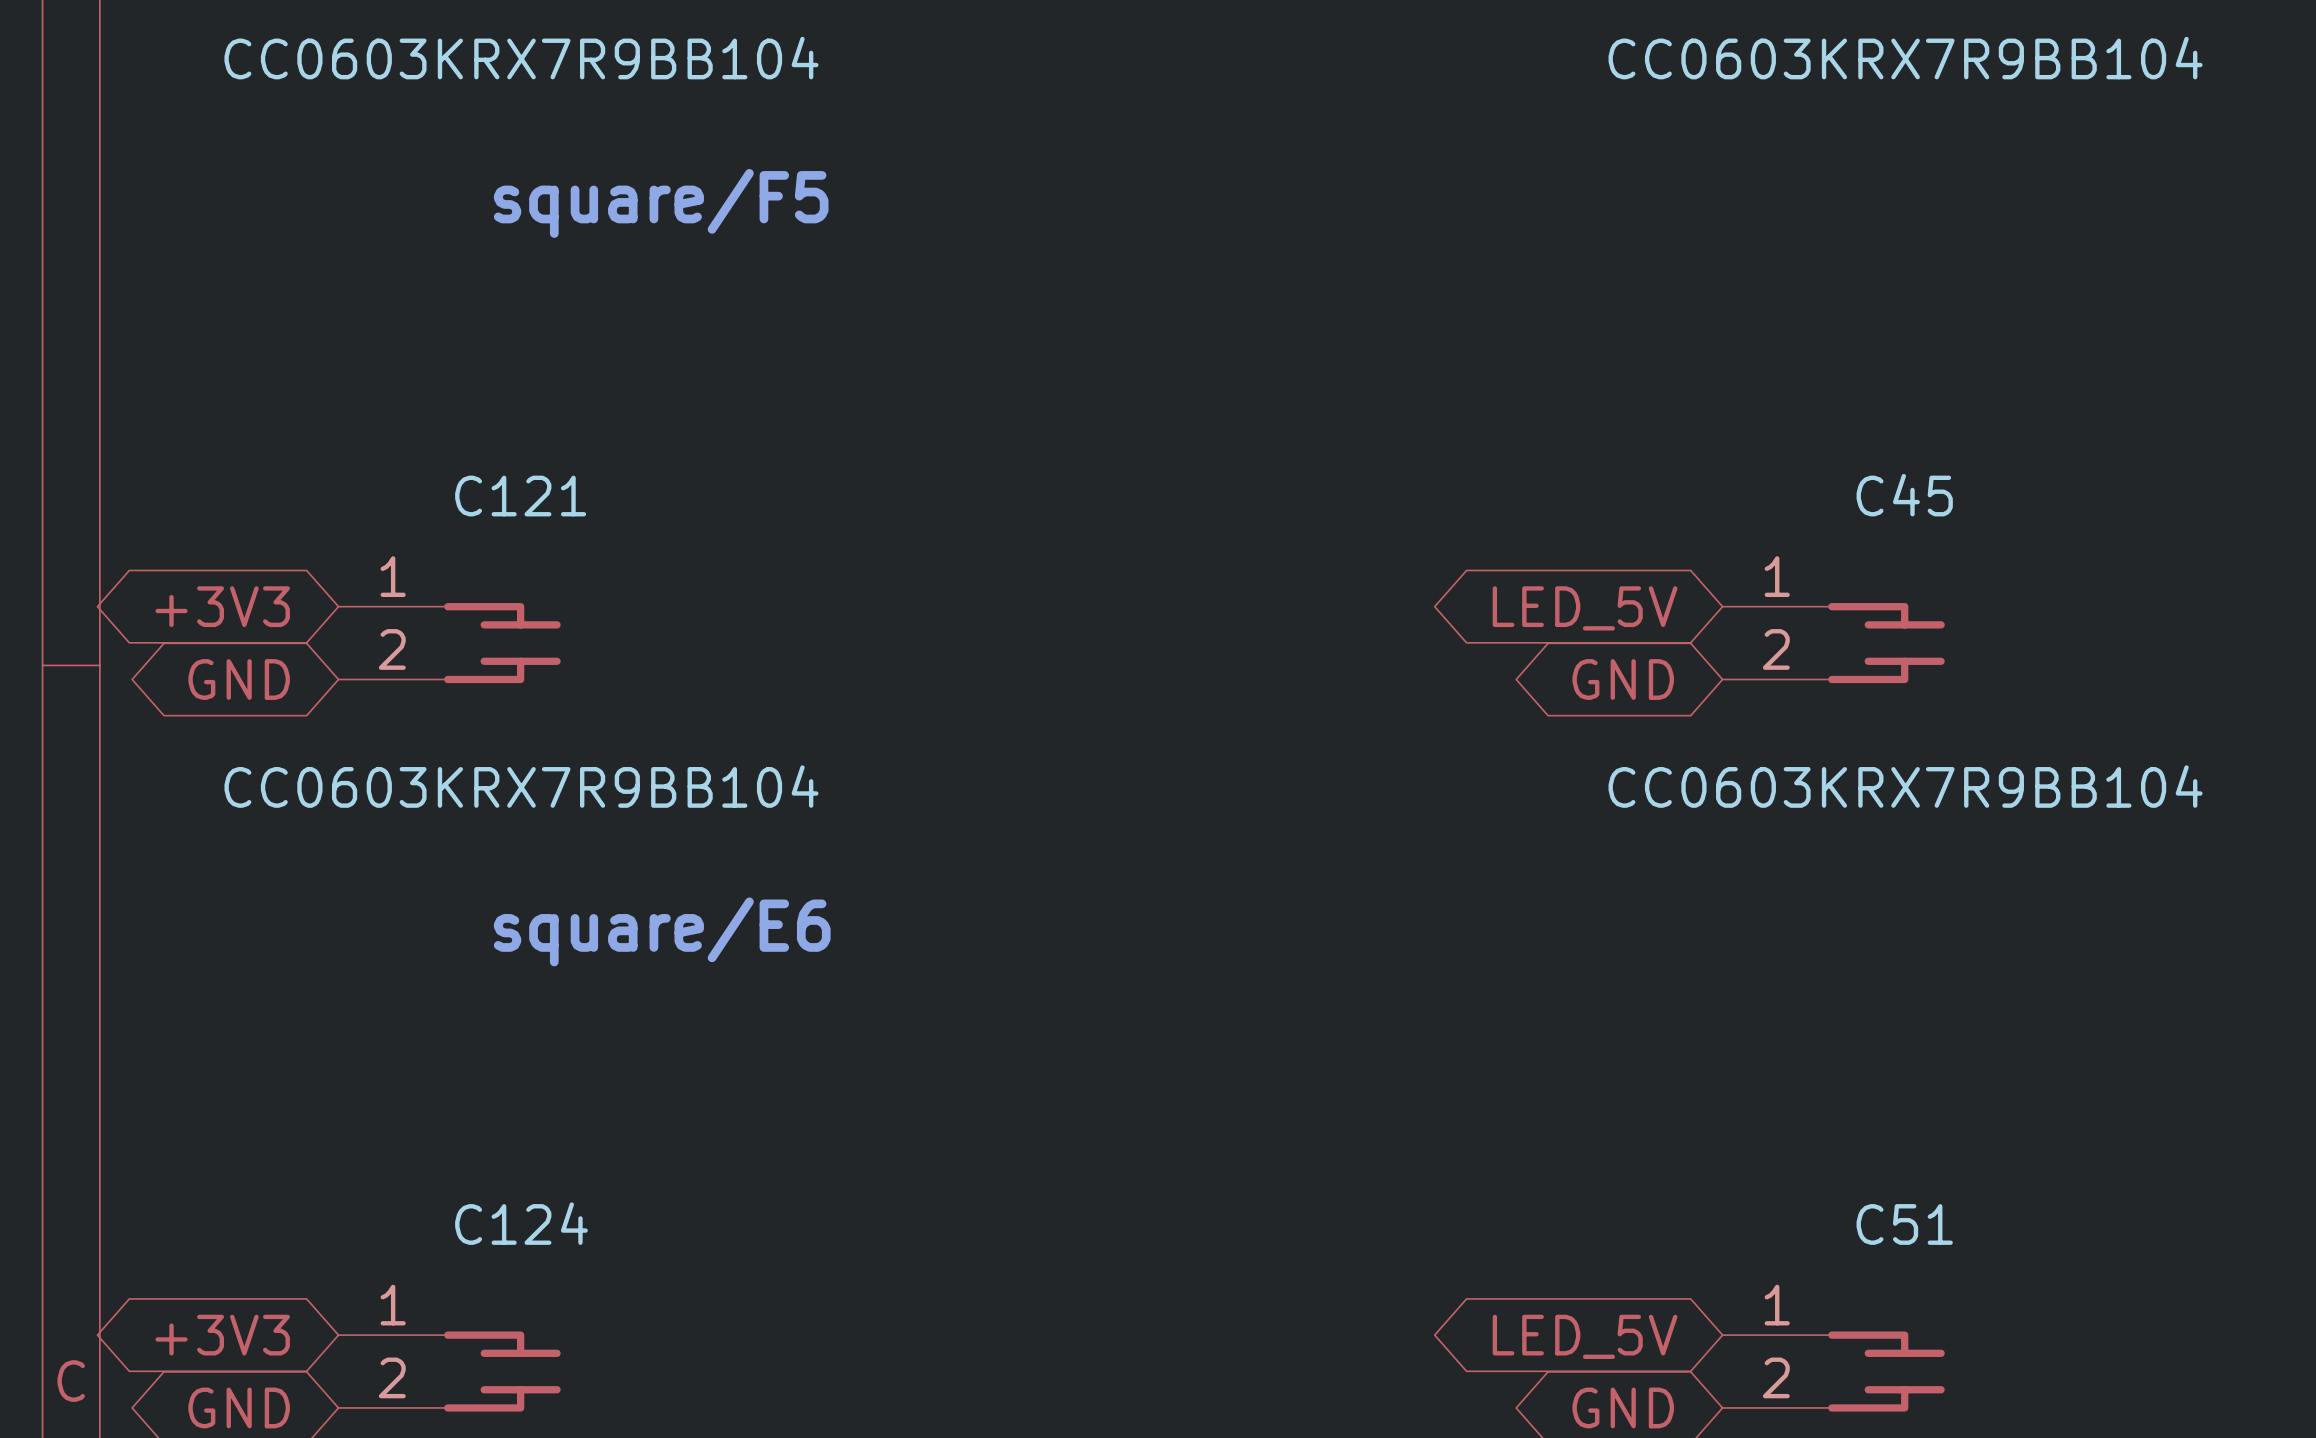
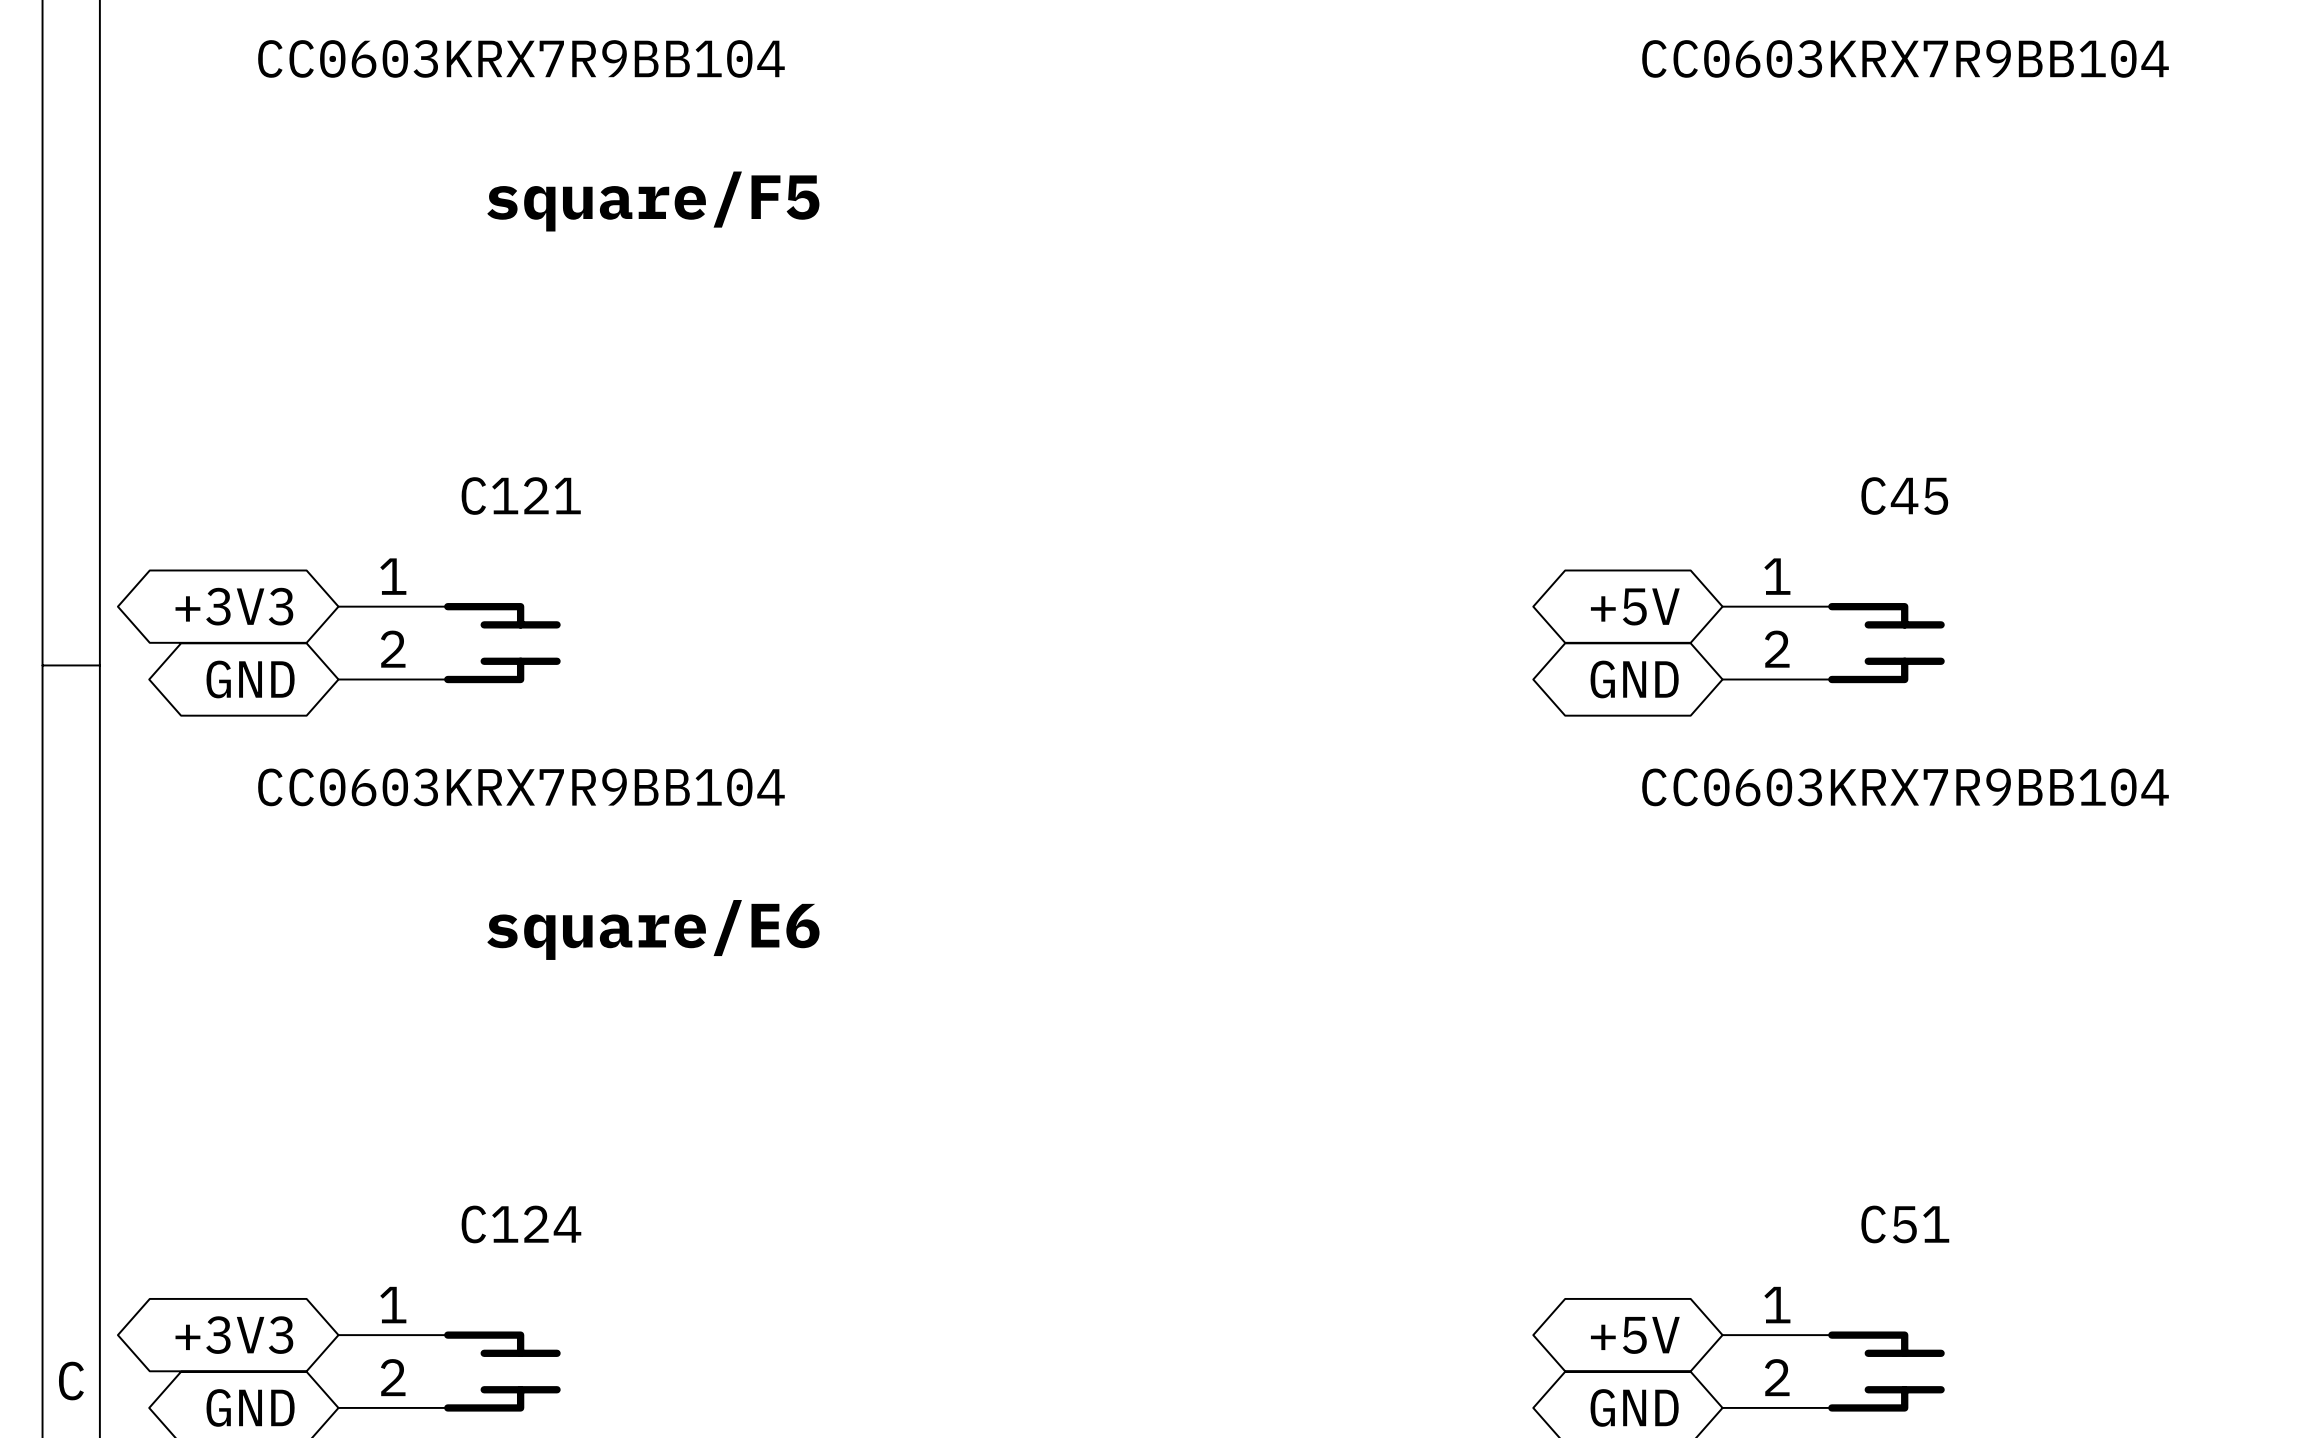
global label: LED_5V (1585, 608) -> +5V (1635, 606)
global label: LED_5V (1585, 1336) -> +5V (1635, 1335)

